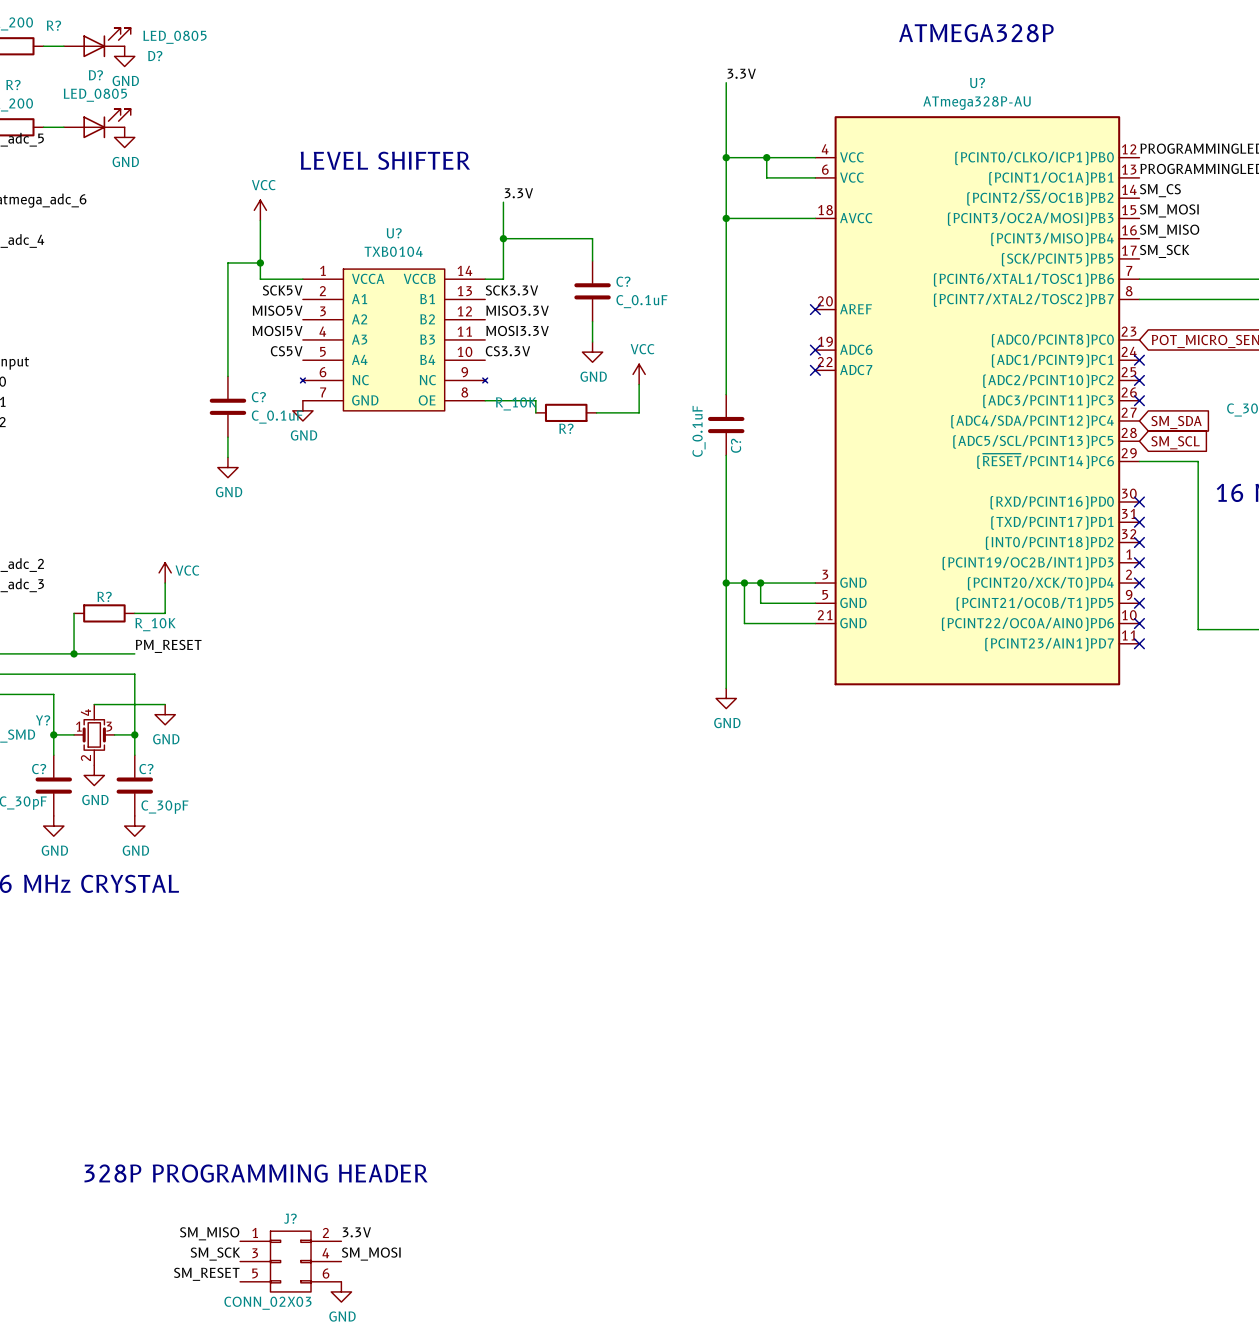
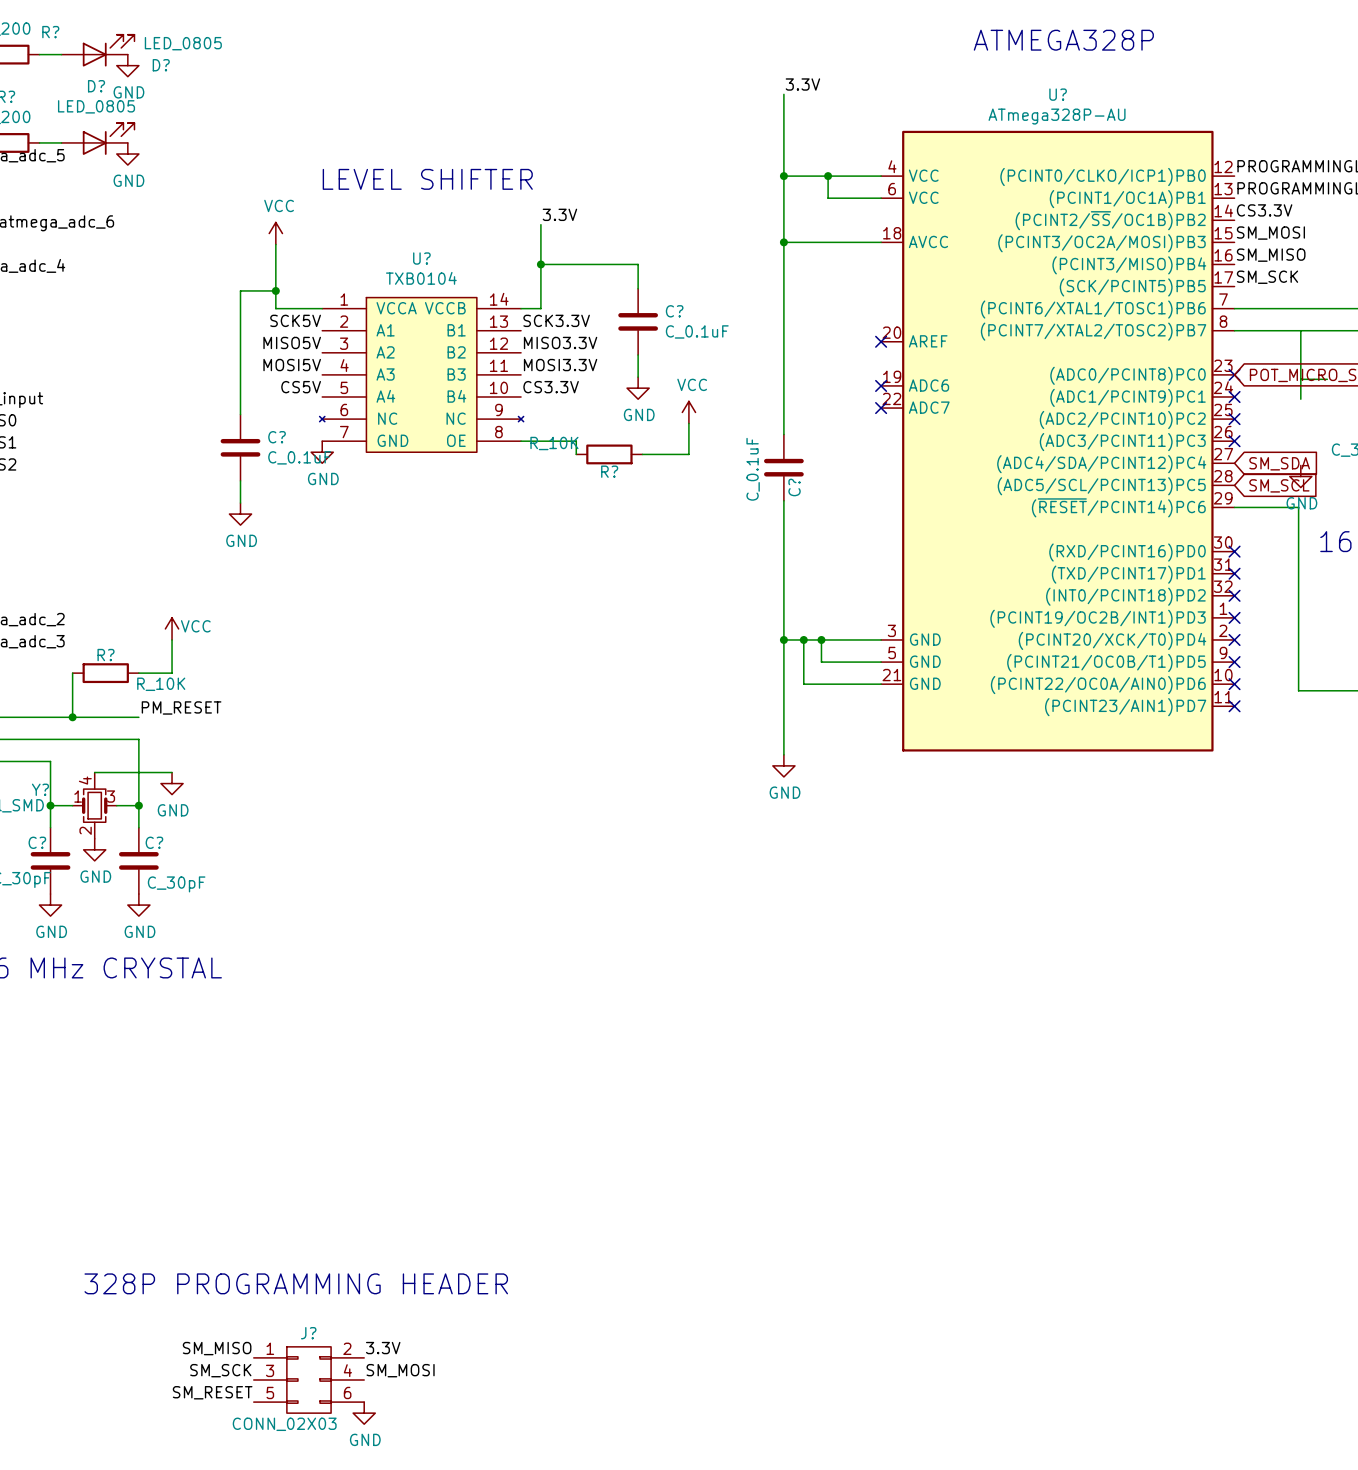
label: SM_CS (1160, 190) -> CS3.3V (1264, 210)
wire: none -> (1300, 330) (1300, 399)
no-connect mark: none -> (1234, 374)
wire: none -> (1300, 379) (1327, 379)
power symbol: none -> GND (1300, 476)

